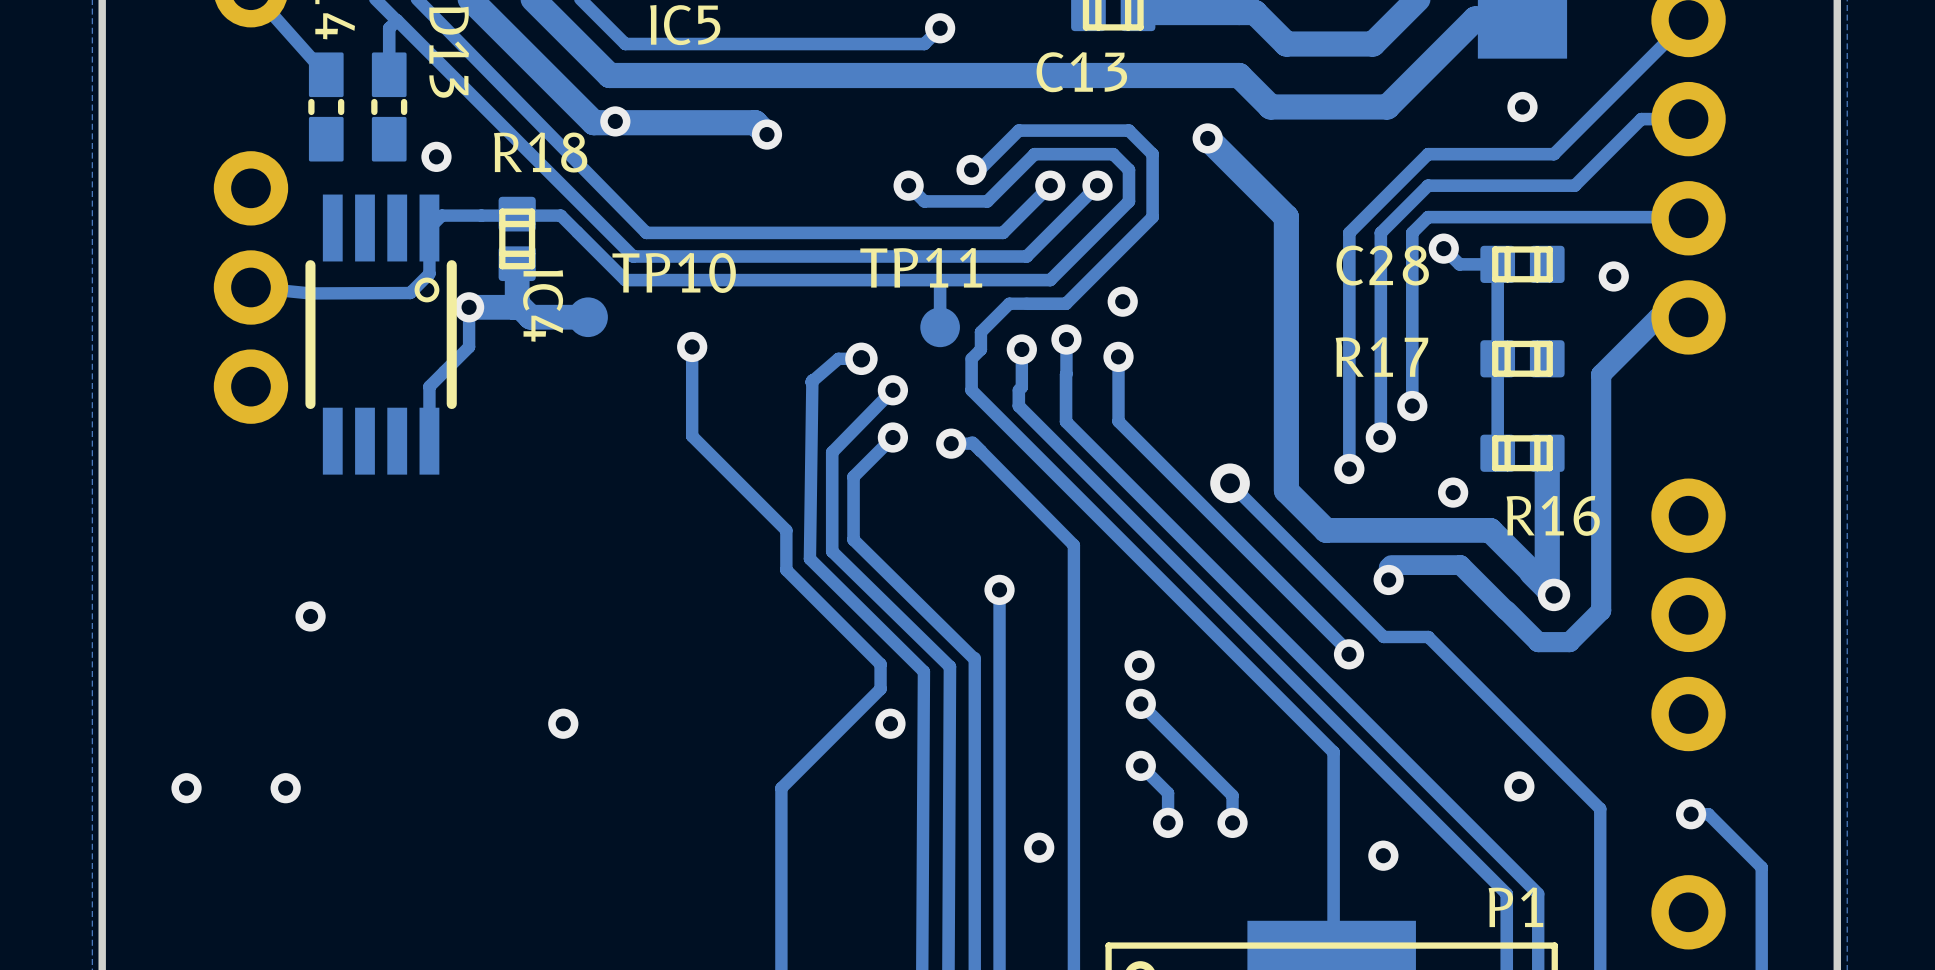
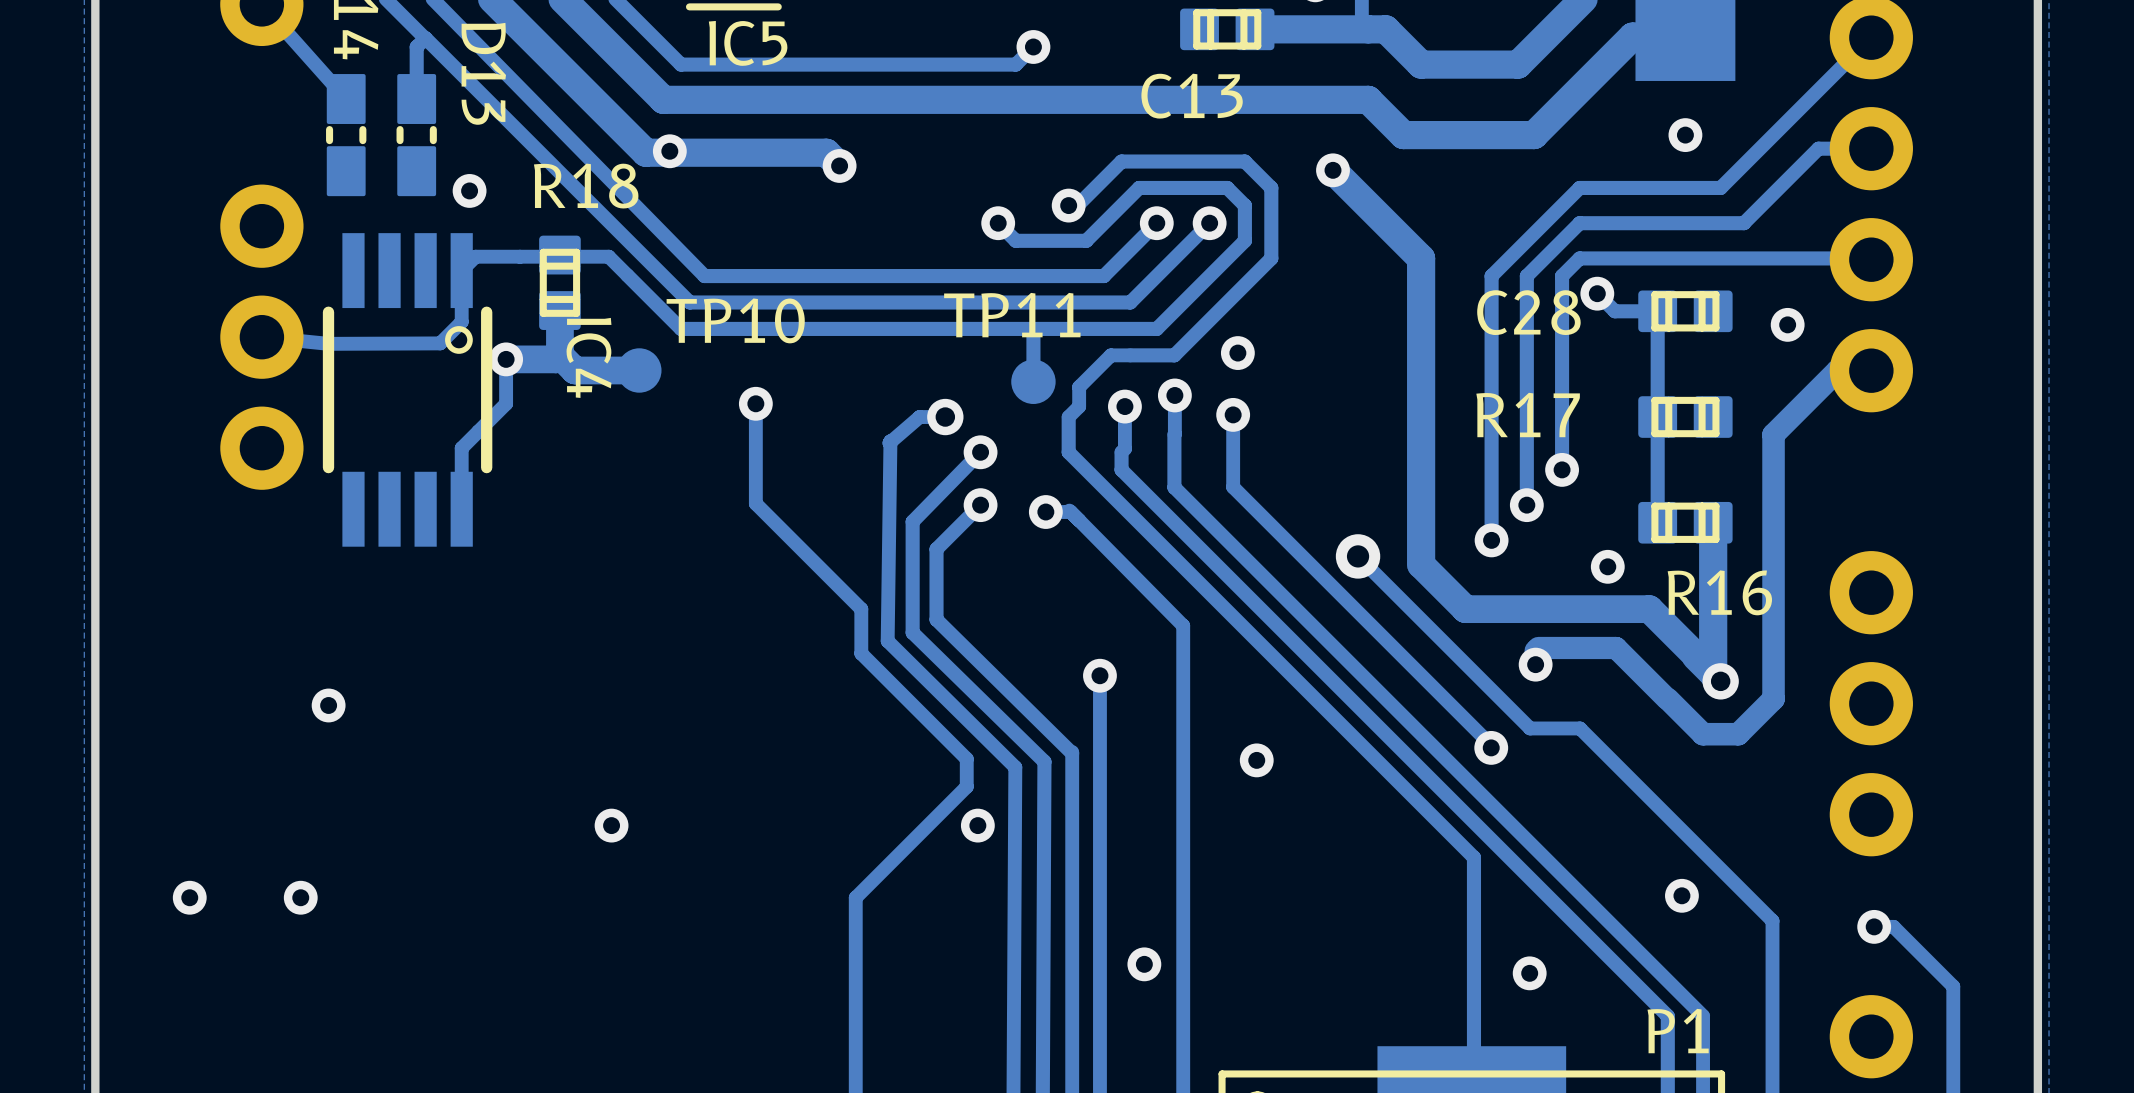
track: (1140, 703) (1232, 795) (1232, 822) -> none
via: (1140, 703) -> none
track: (1140, 765) (1168, 793) (1168, 822) -> none
via: (1140, 765) -> none
via: (1168, 822) -> none
via: (1232, 822) -> none

